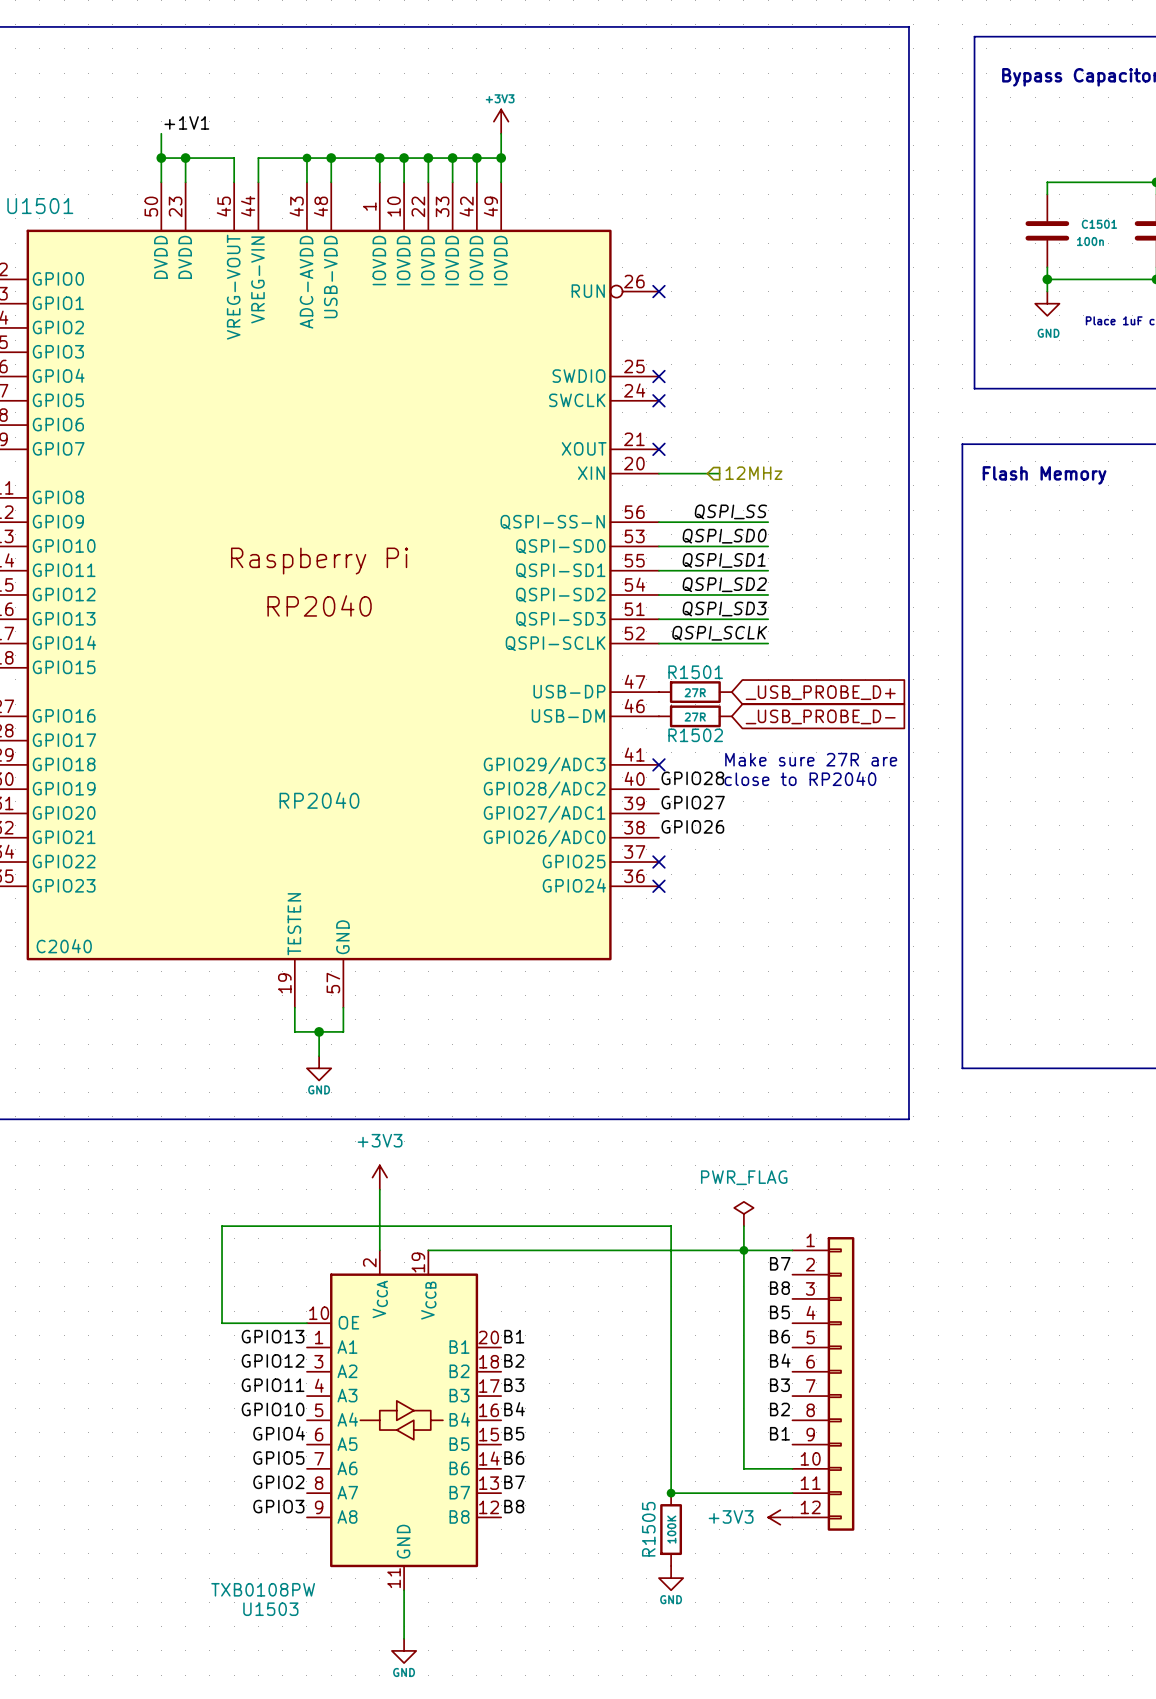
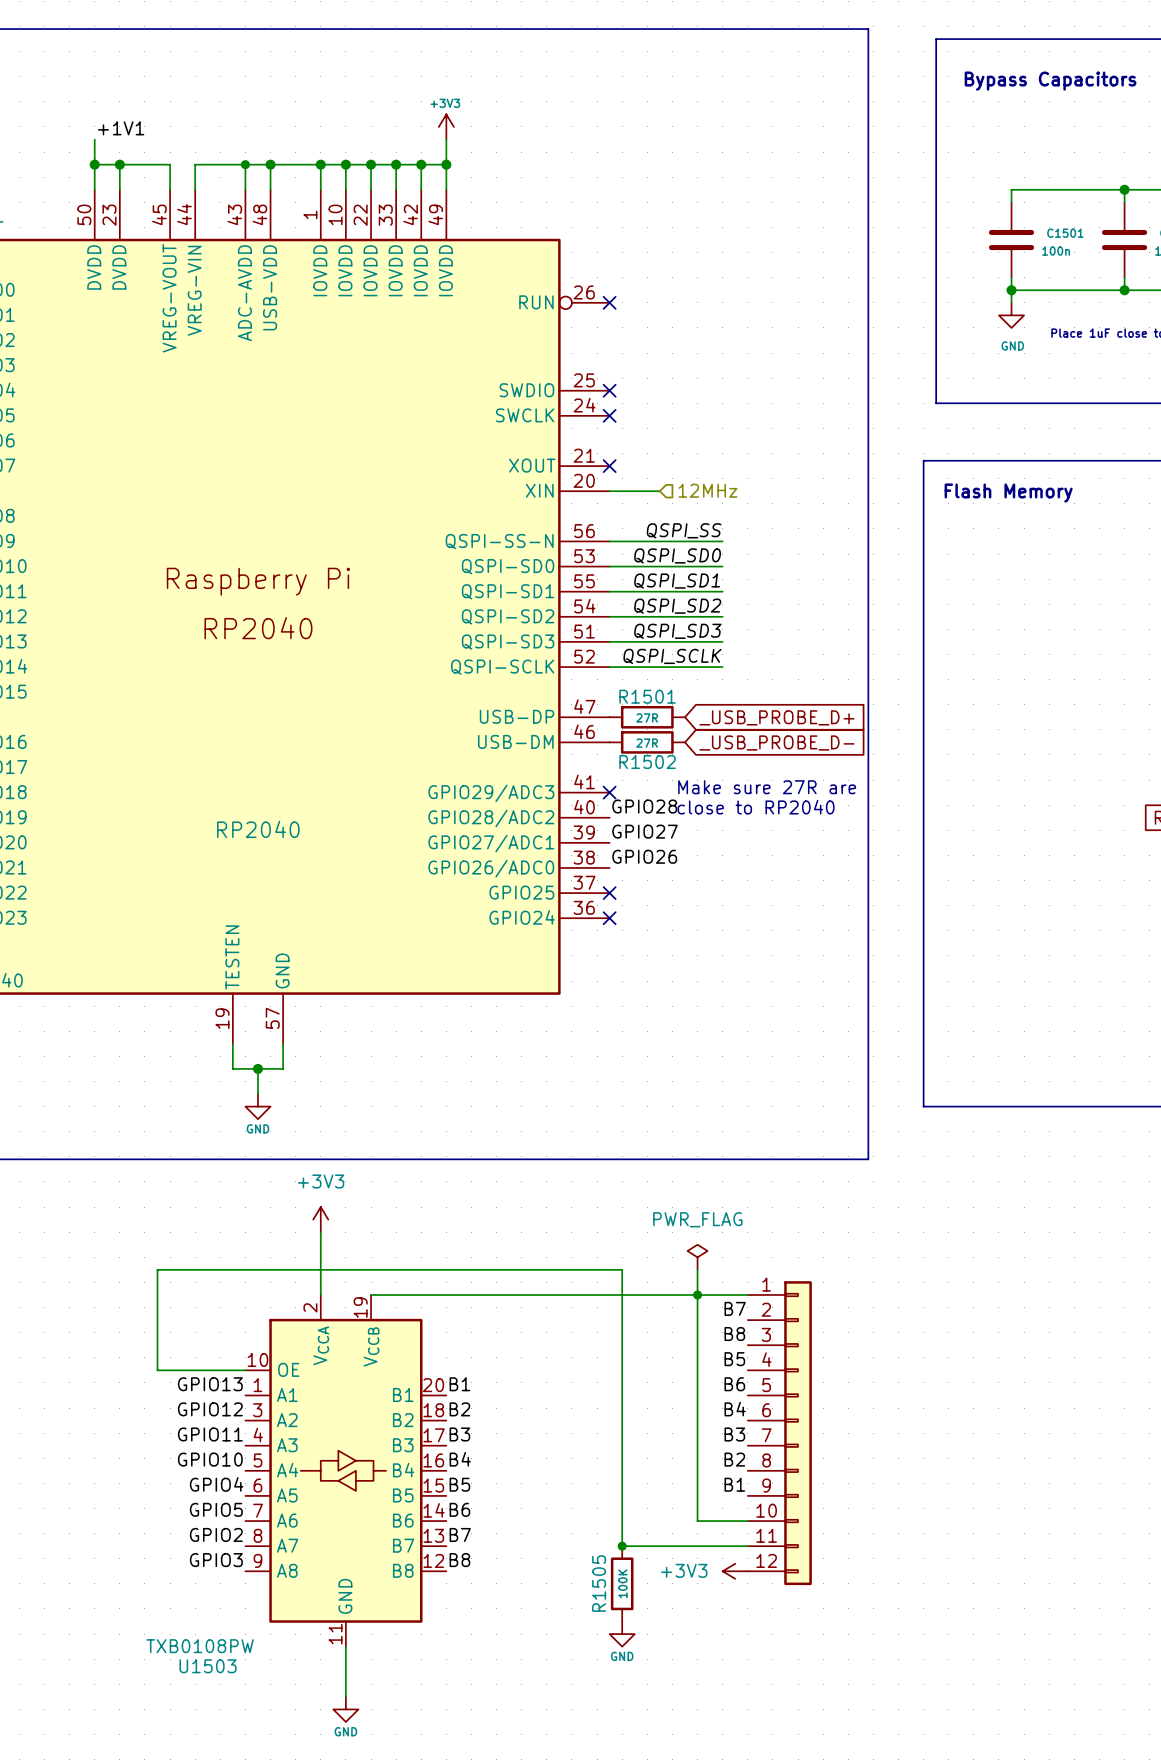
wire: (707, 473) (719, 473) -> none

